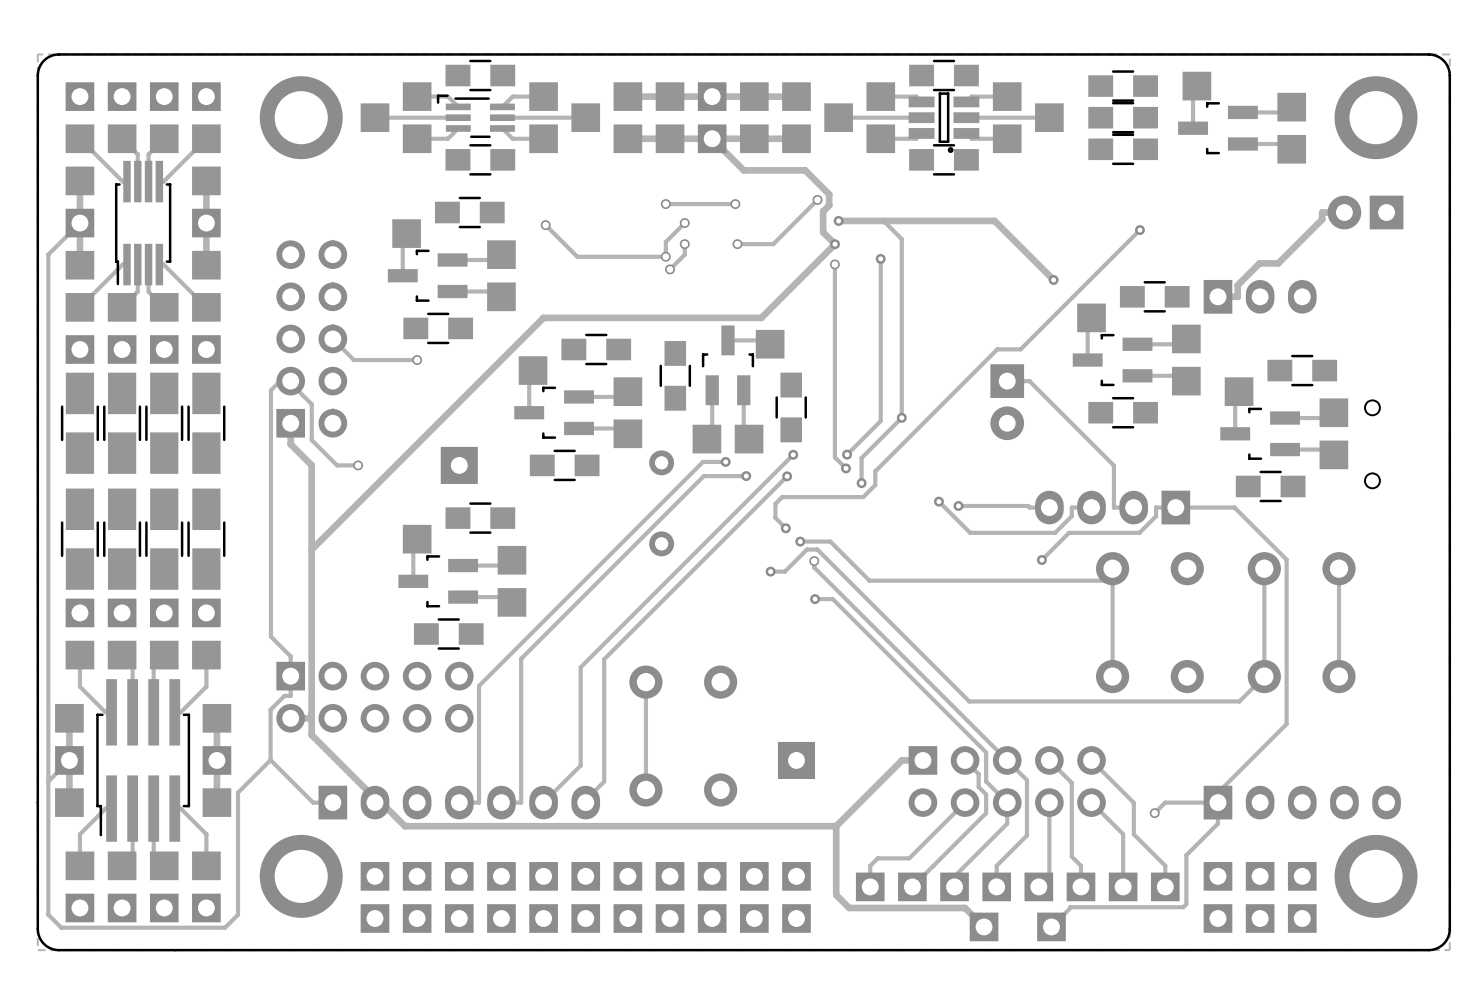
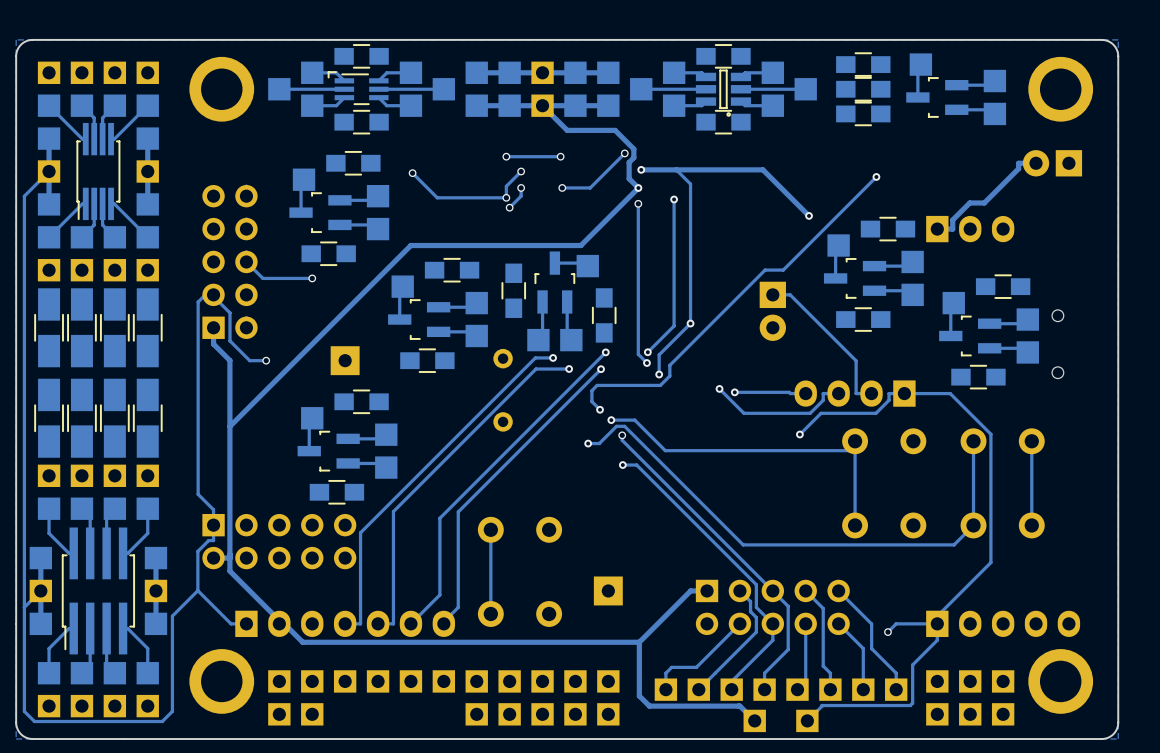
part: (459, 918) -> none
part: (501, 918) -> none
part: (543, 918) -> none
part: (585, 918) -> none

